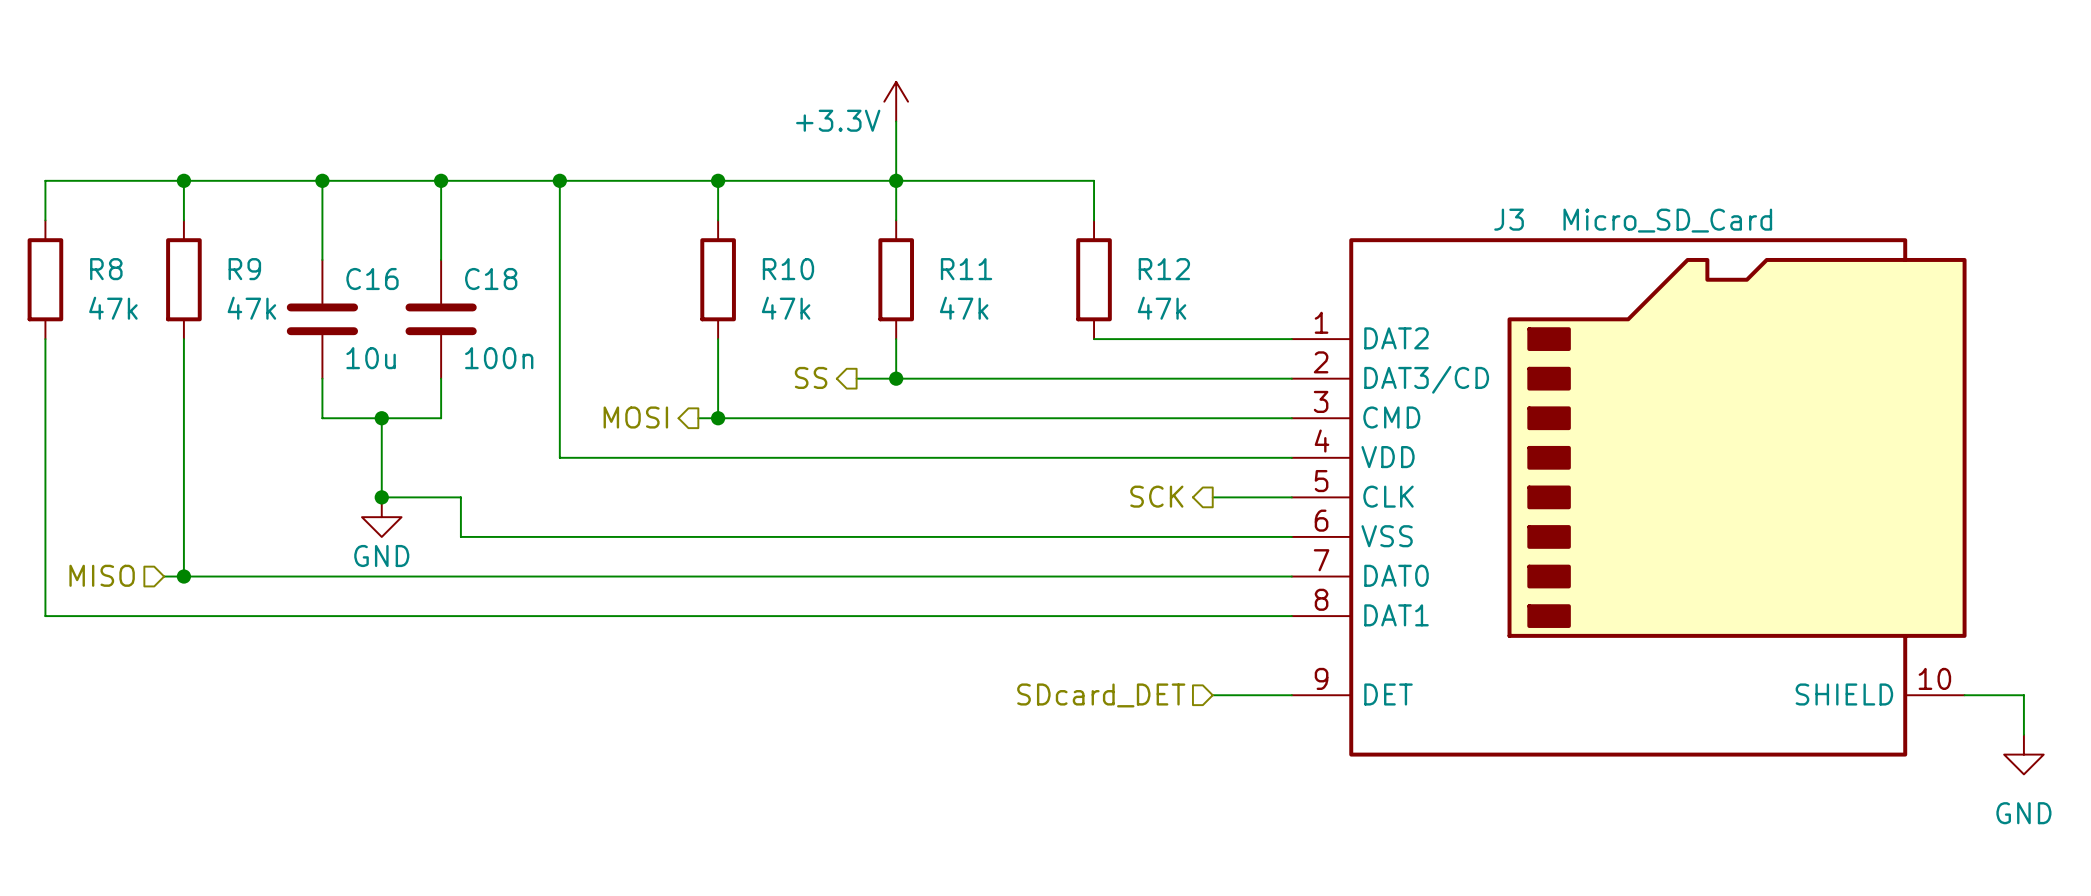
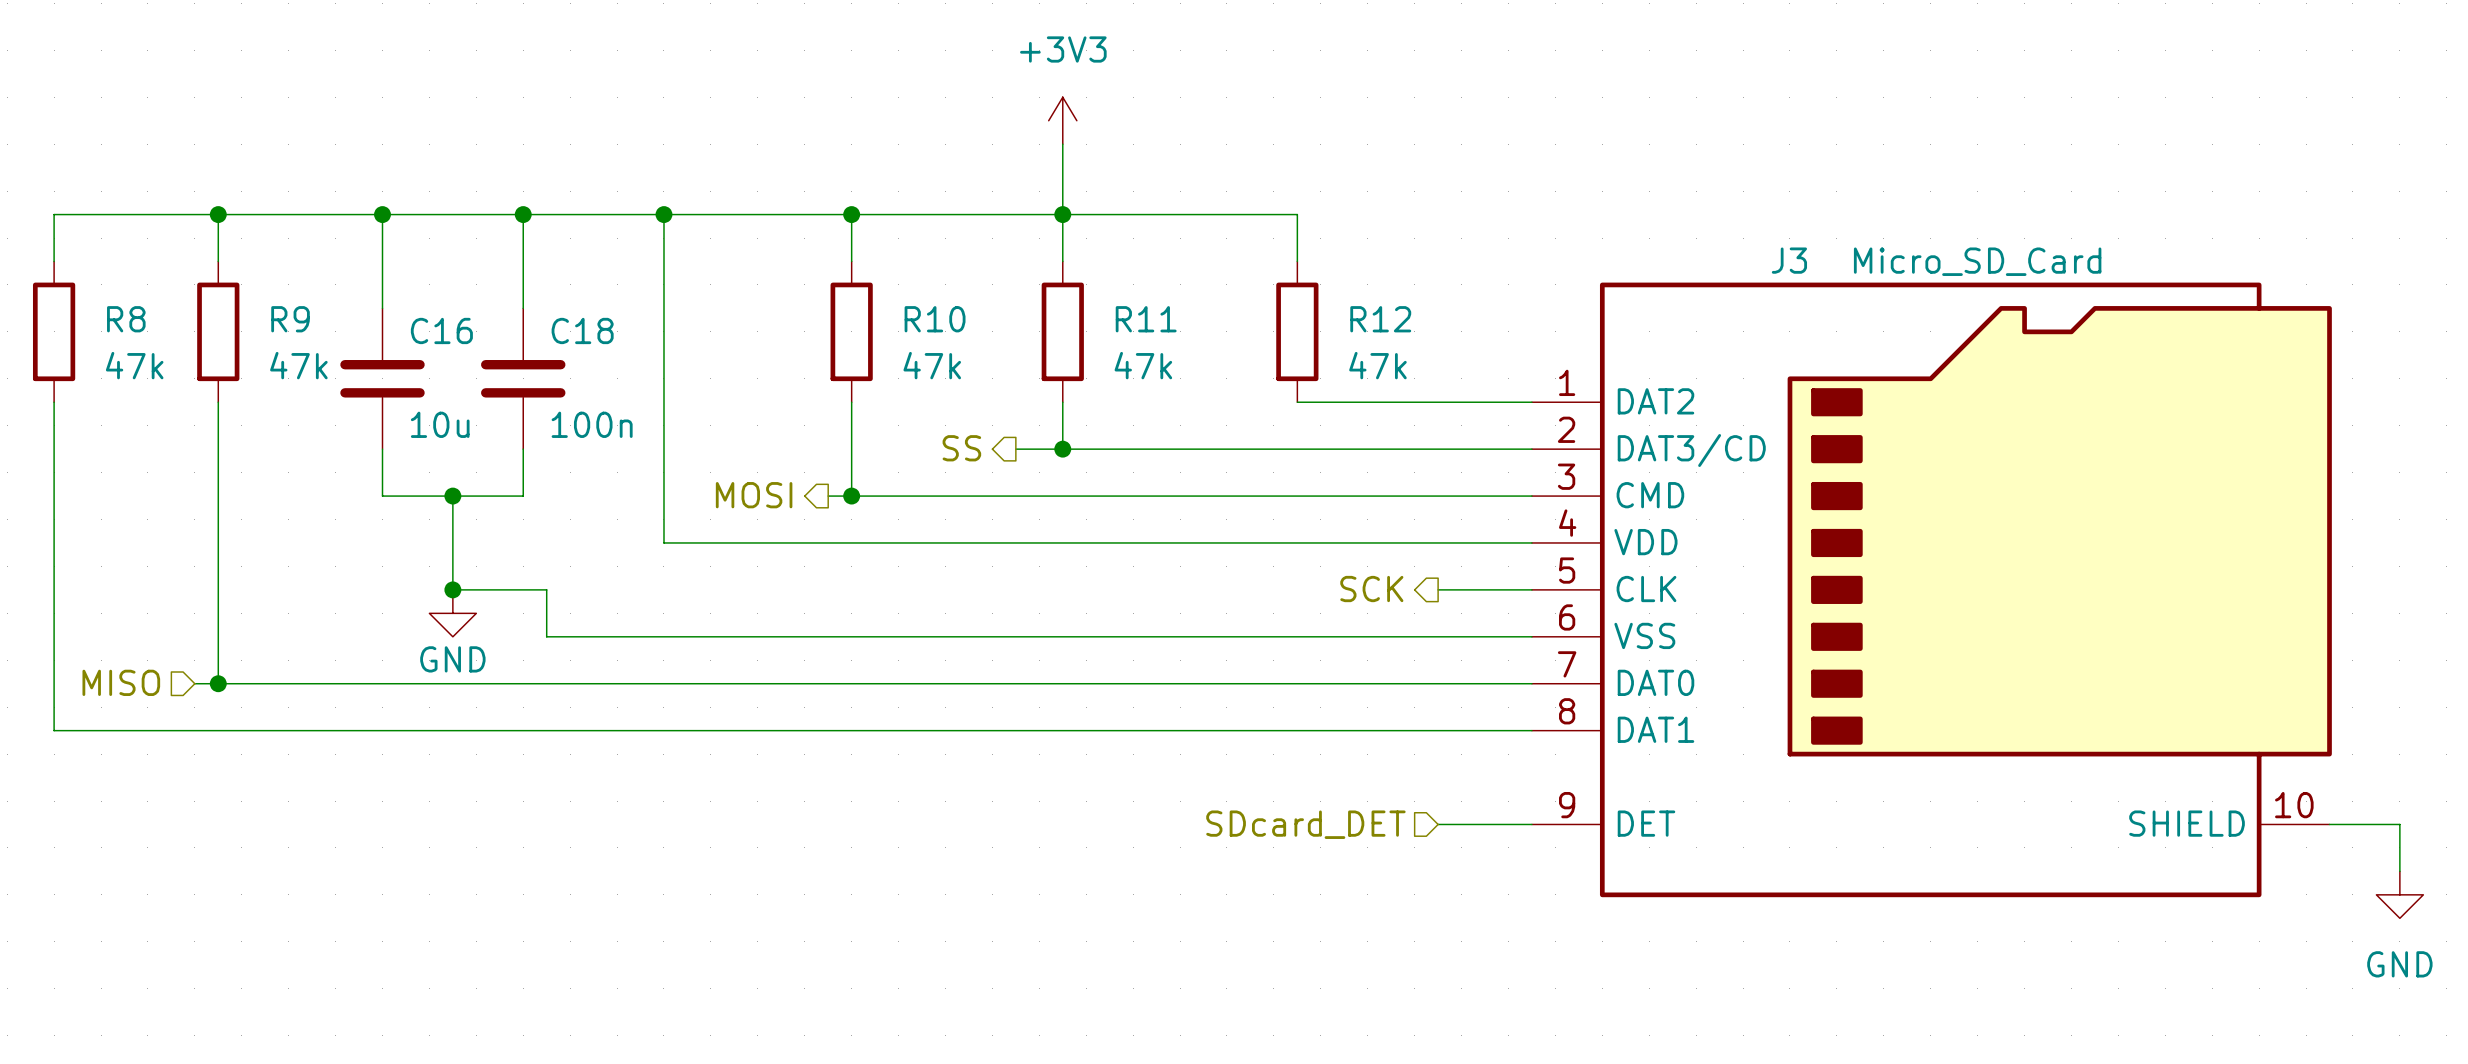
power symbol: +3.3V (896, 101) -> +3V3 (1062, 120)

